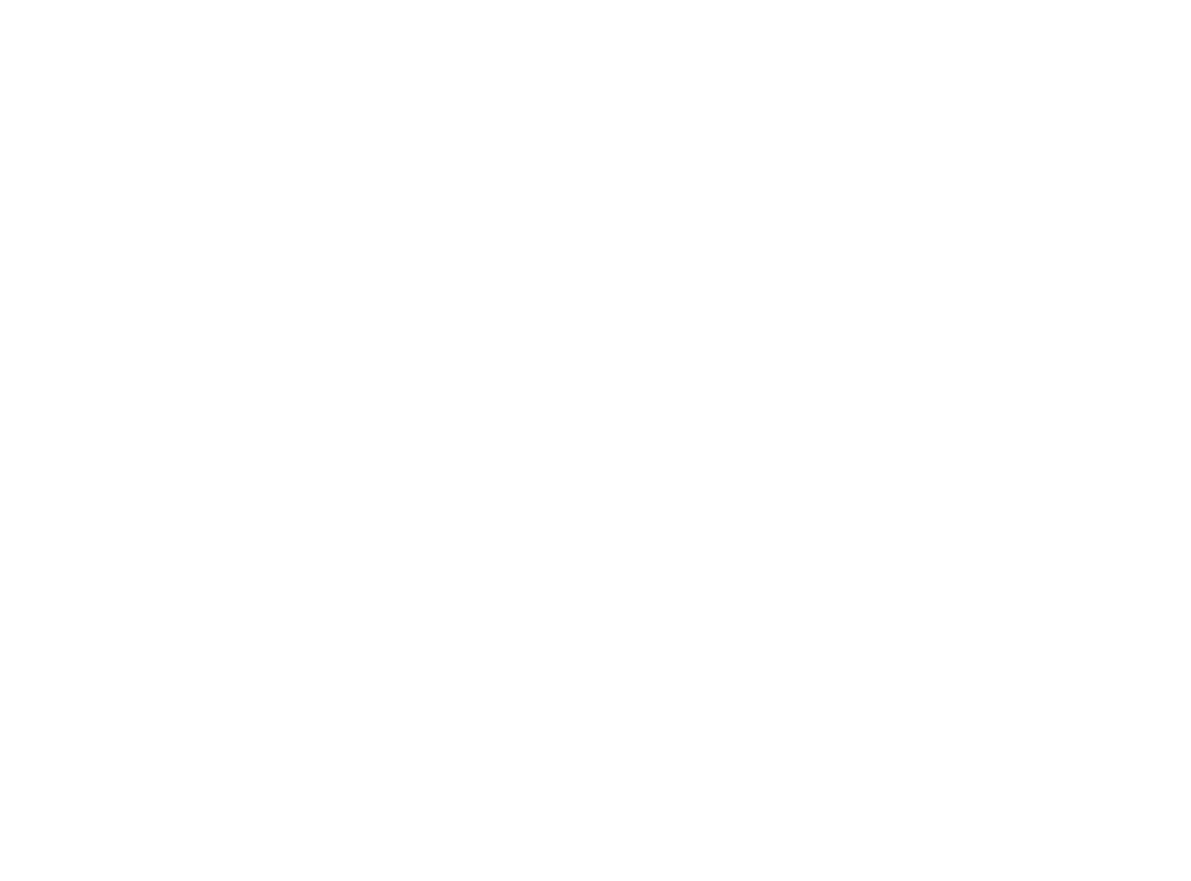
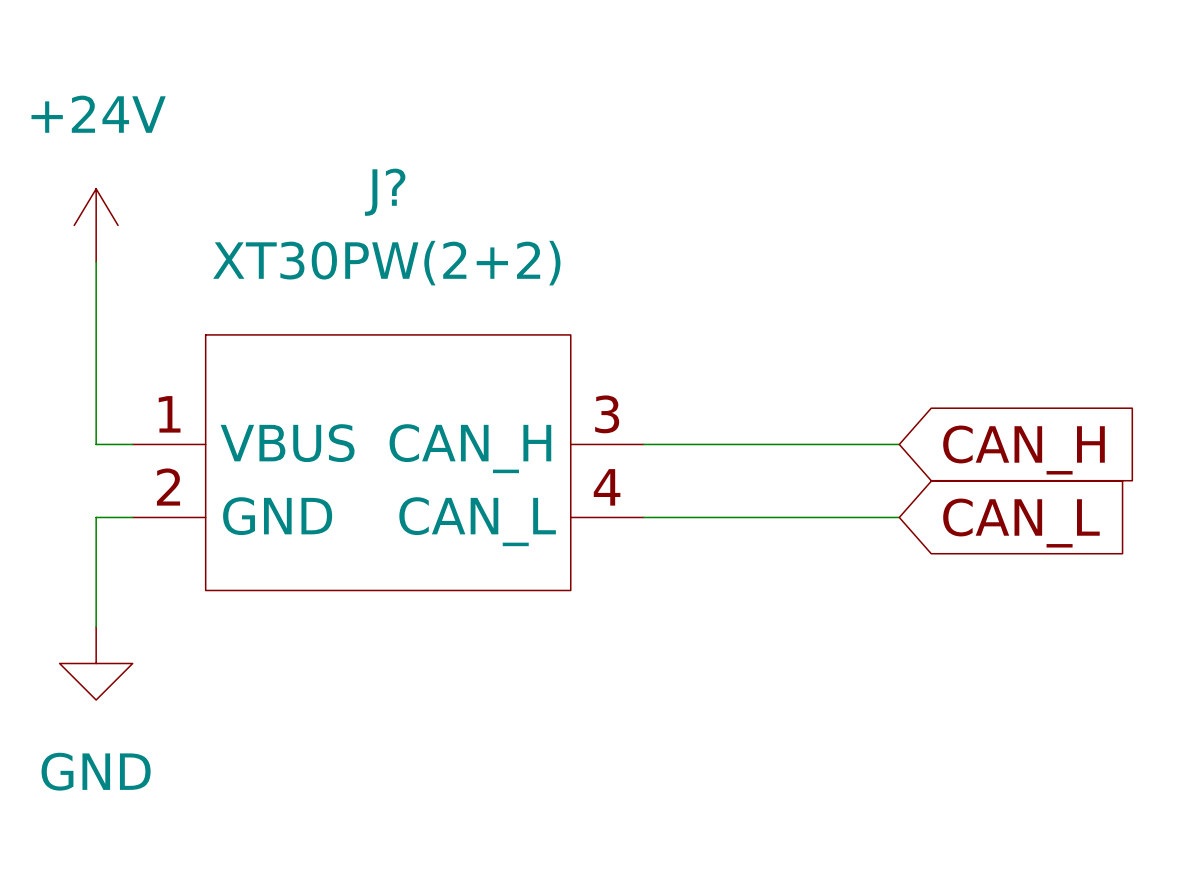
power symbol: none -> +24V (96, 225)
wire: none -> (96, 261) (96, 444) (132, 444)
wire: none -> (643, 444) (899, 444)
global label: none -> CAN_H (1024, 450)
J?: none -> XT30PW(2+2) (388, 462)
wire: none -> (132, 517) (96, 517) (96, 626)
wire: none -> (643, 517) (899, 517)
global label: none -> CAN_L (1021, 523)
power symbol: none -> GND (96, 663)

